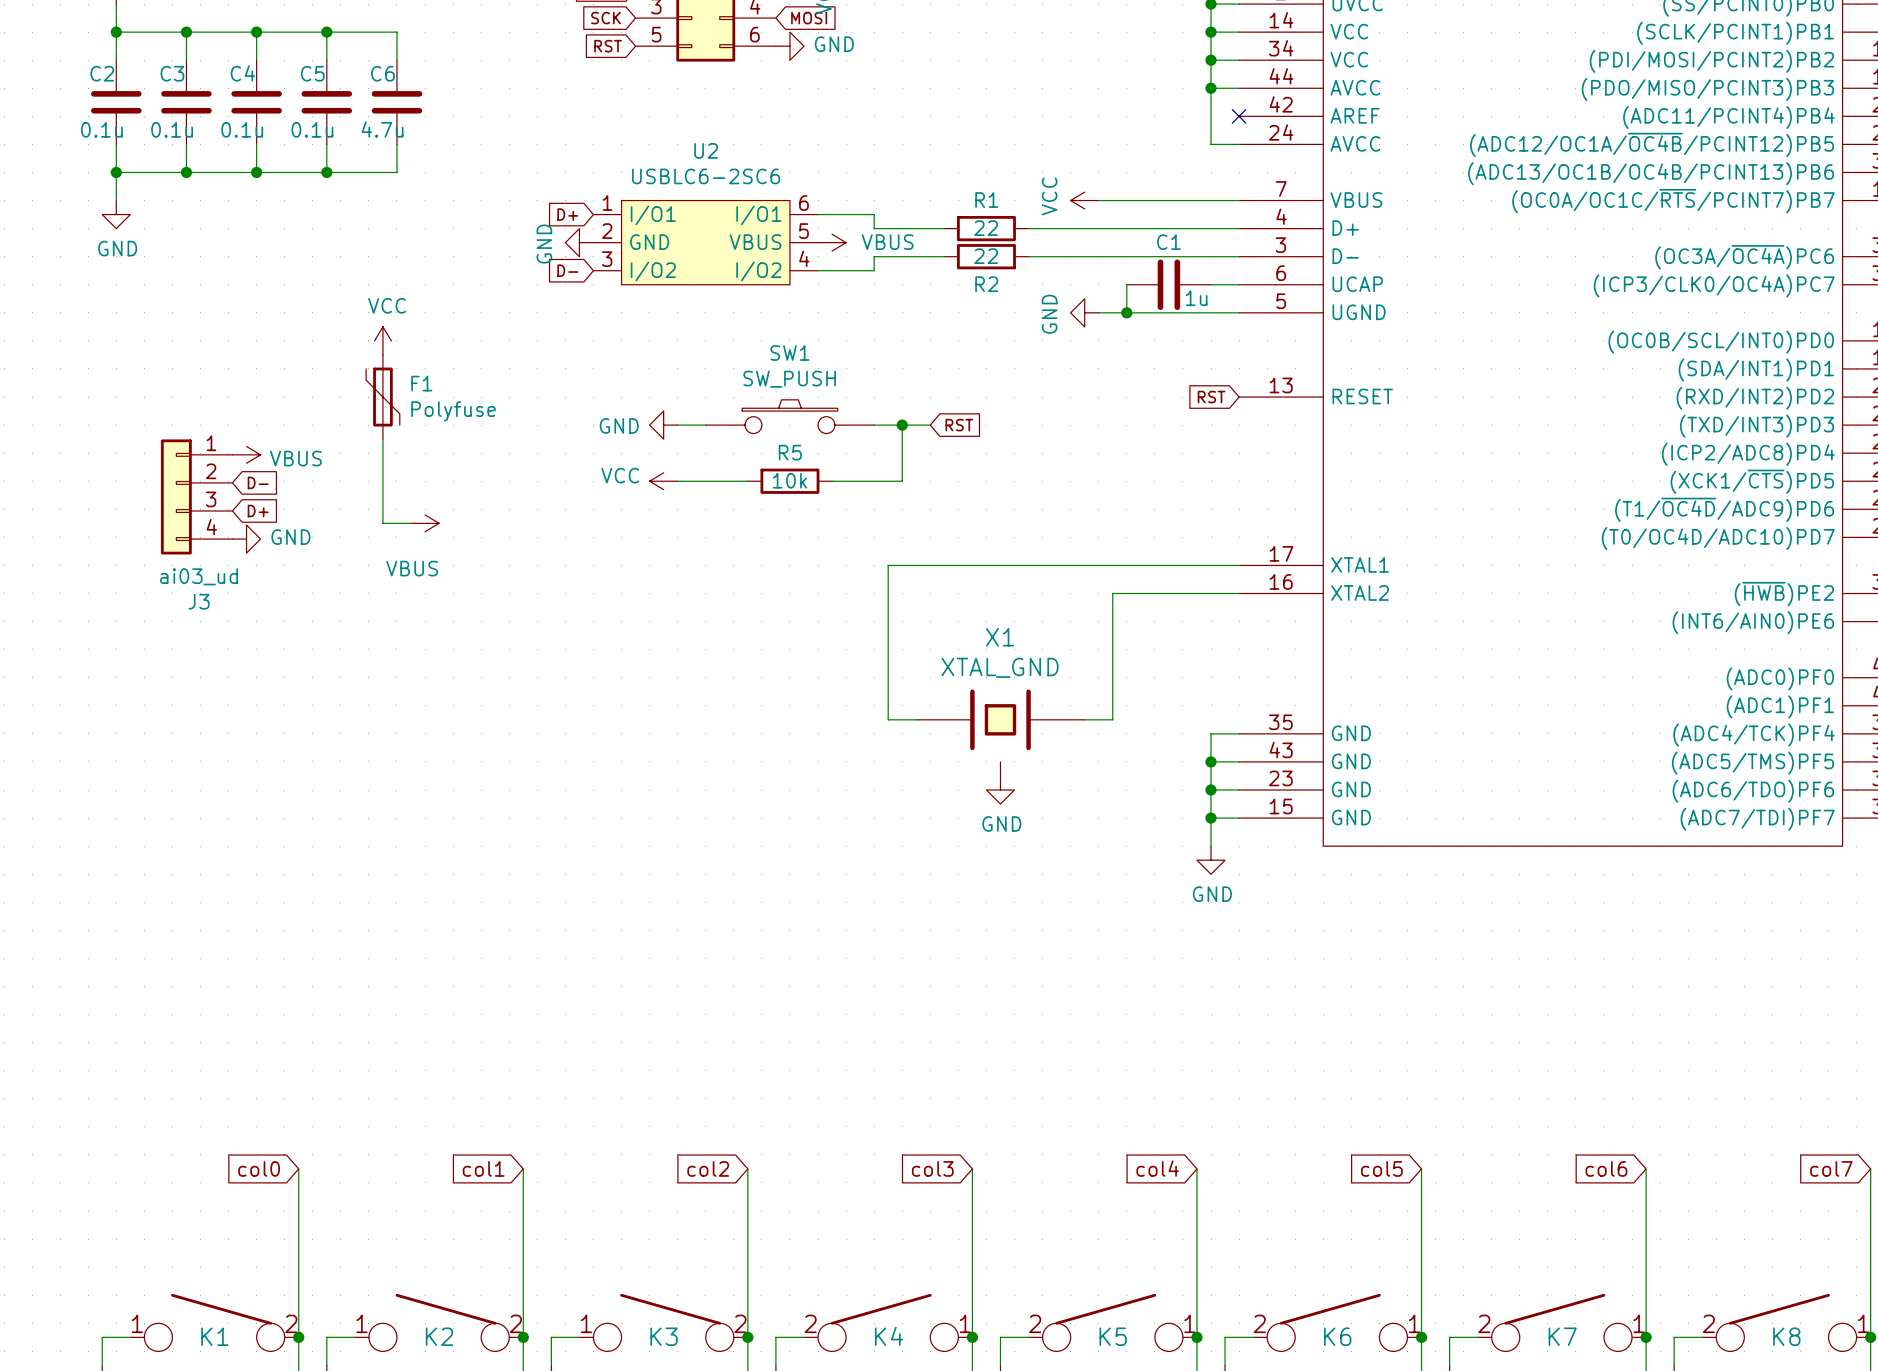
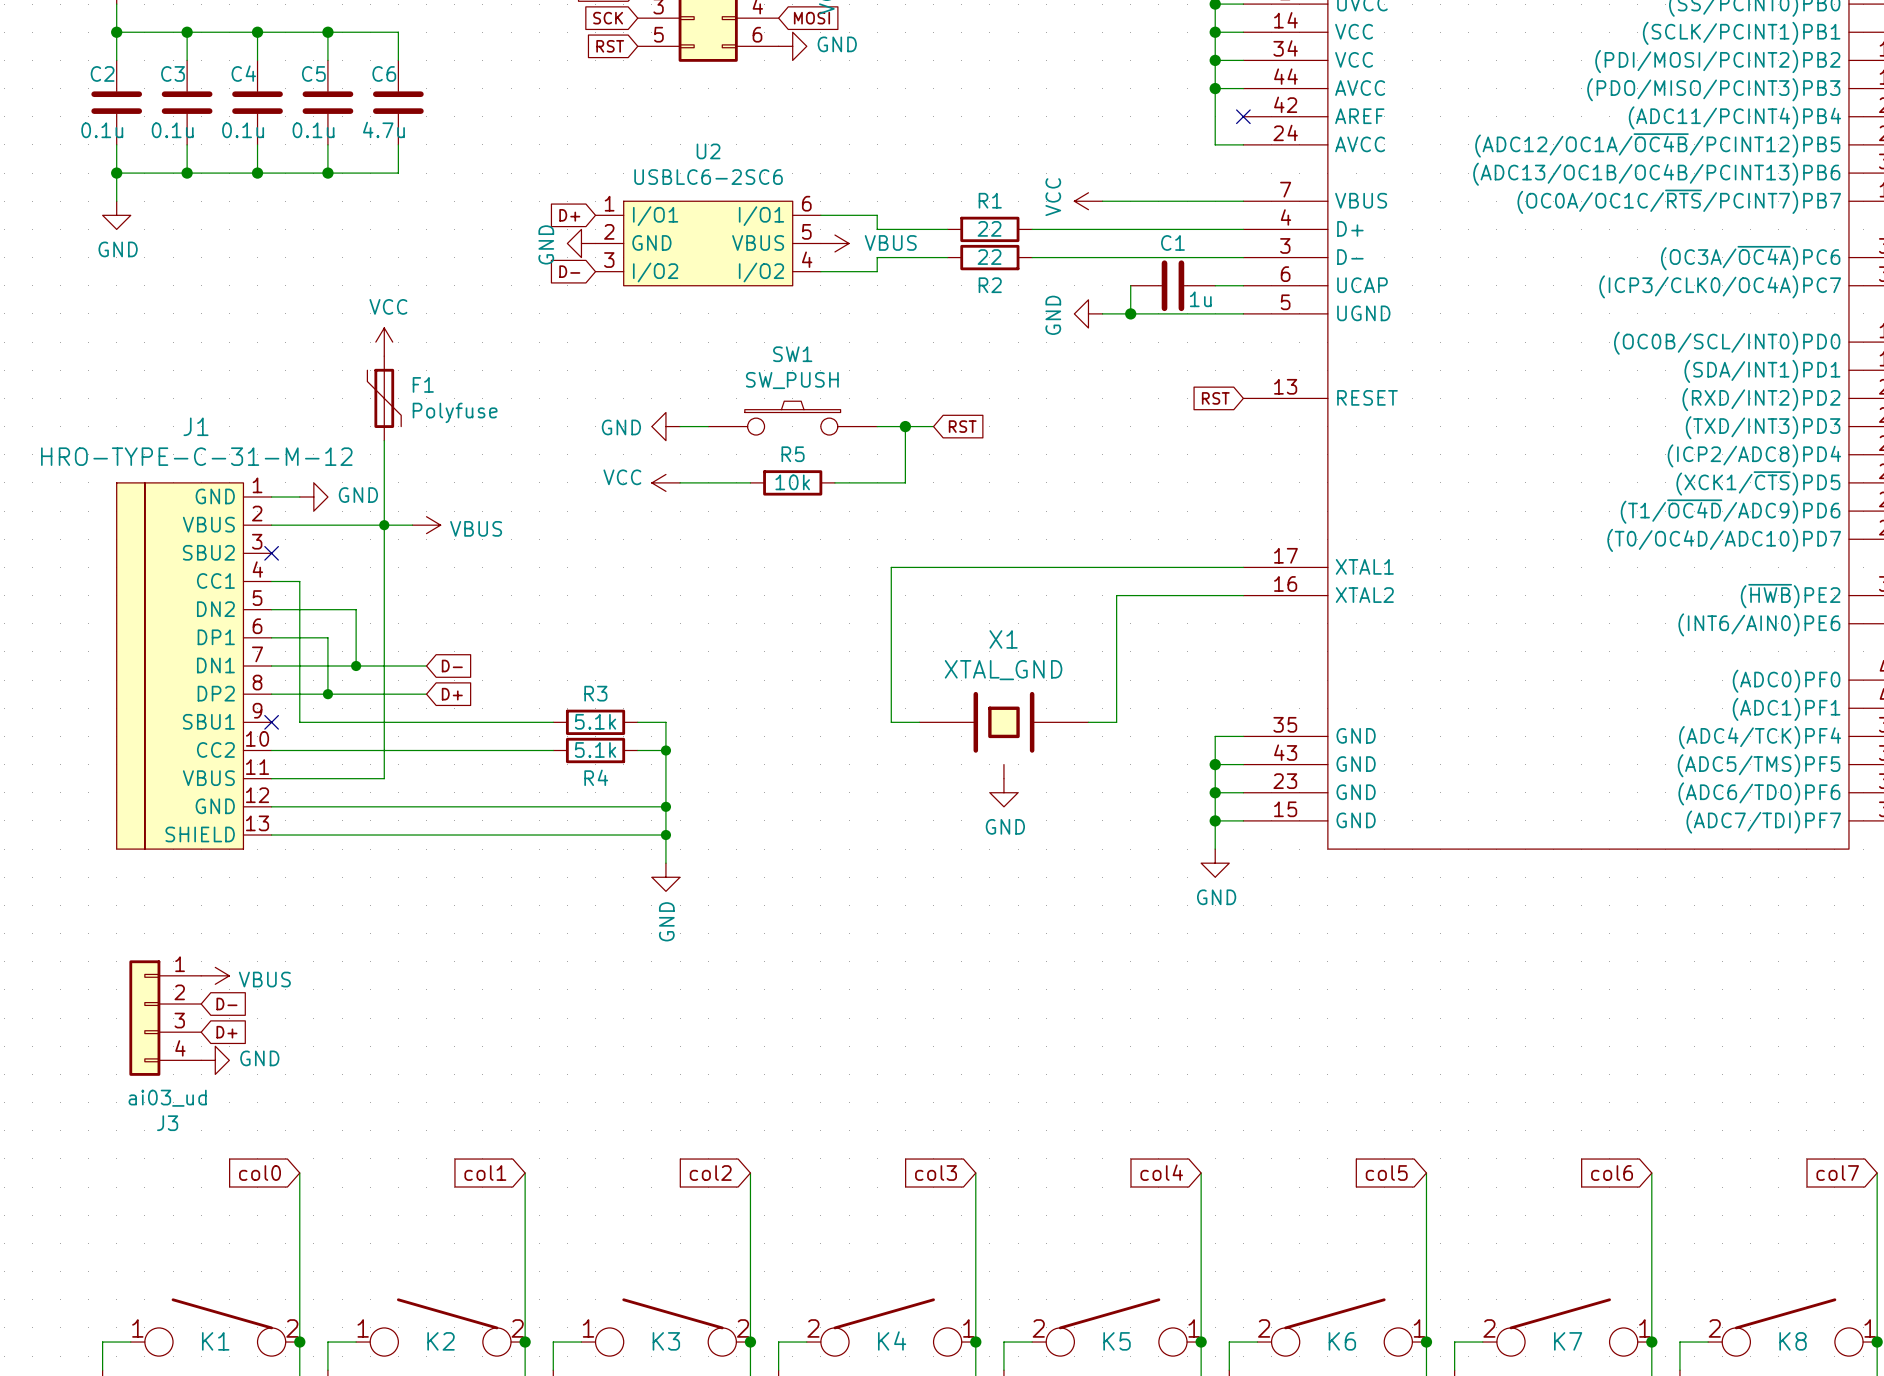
power symbol: VBUS (246, 454) -> none
global label: D- (258, 482) -> none
wire: none -> (271, 496) (299, 496)
J3 position: (196, 496) -> (165, 1018)
global label: D+ (258, 510) -> none
wire: none -> (271, 525) (384, 525) (384, 778) (271, 778)
junction: none -> (384, 525)
power symbol position: GND (246, 539) -> GND (313, 496)
no-connect mark: none -> (271, 553)
power symbol text position: VBUS (412, 568) -> VBUS (476, 528)
wire: none -> (271, 581) (299, 581) (299, 722) (553, 722)
wire: none -> (271, 609) (356, 609) (356, 666)
wire: none -> (271, 637) (327, 637) (327, 694)
J1: none -> HRO-TYPE-C-31-M-12 (194, 666)
wire: none -> (271, 666) (426, 666)
junction: none -> (356, 666)
global label: none -> D- (452, 666)
wire: none -> (271, 694) (426, 694)
junction: none -> (327, 694)
global label: none -> D+ (452, 694)
no-connect mark: none -> (271, 722)
R3: none -> 5.1k (595, 722)
wire: none -> (637, 722) (665, 722) (665, 863)
wire: none -> (271, 750) (553, 750)
R4: none -> 5.1k (595, 750)
wire: none -> (637, 750) (665, 750)
junction: none -> (665, 750)
wire: none -> (271, 806) (665, 806)
junction: none -> (665, 806)
wire: none -> (271, 835) (665, 835)
junction: none -> (665, 835)
power symbol: none -> GND (665, 877)
power symbol: none -> VBUS (215, 975)
global label: none -> D- (226, 1004)
global label: none -> D+ (226, 1032)
power symbol: none -> GND (215, 1060)

